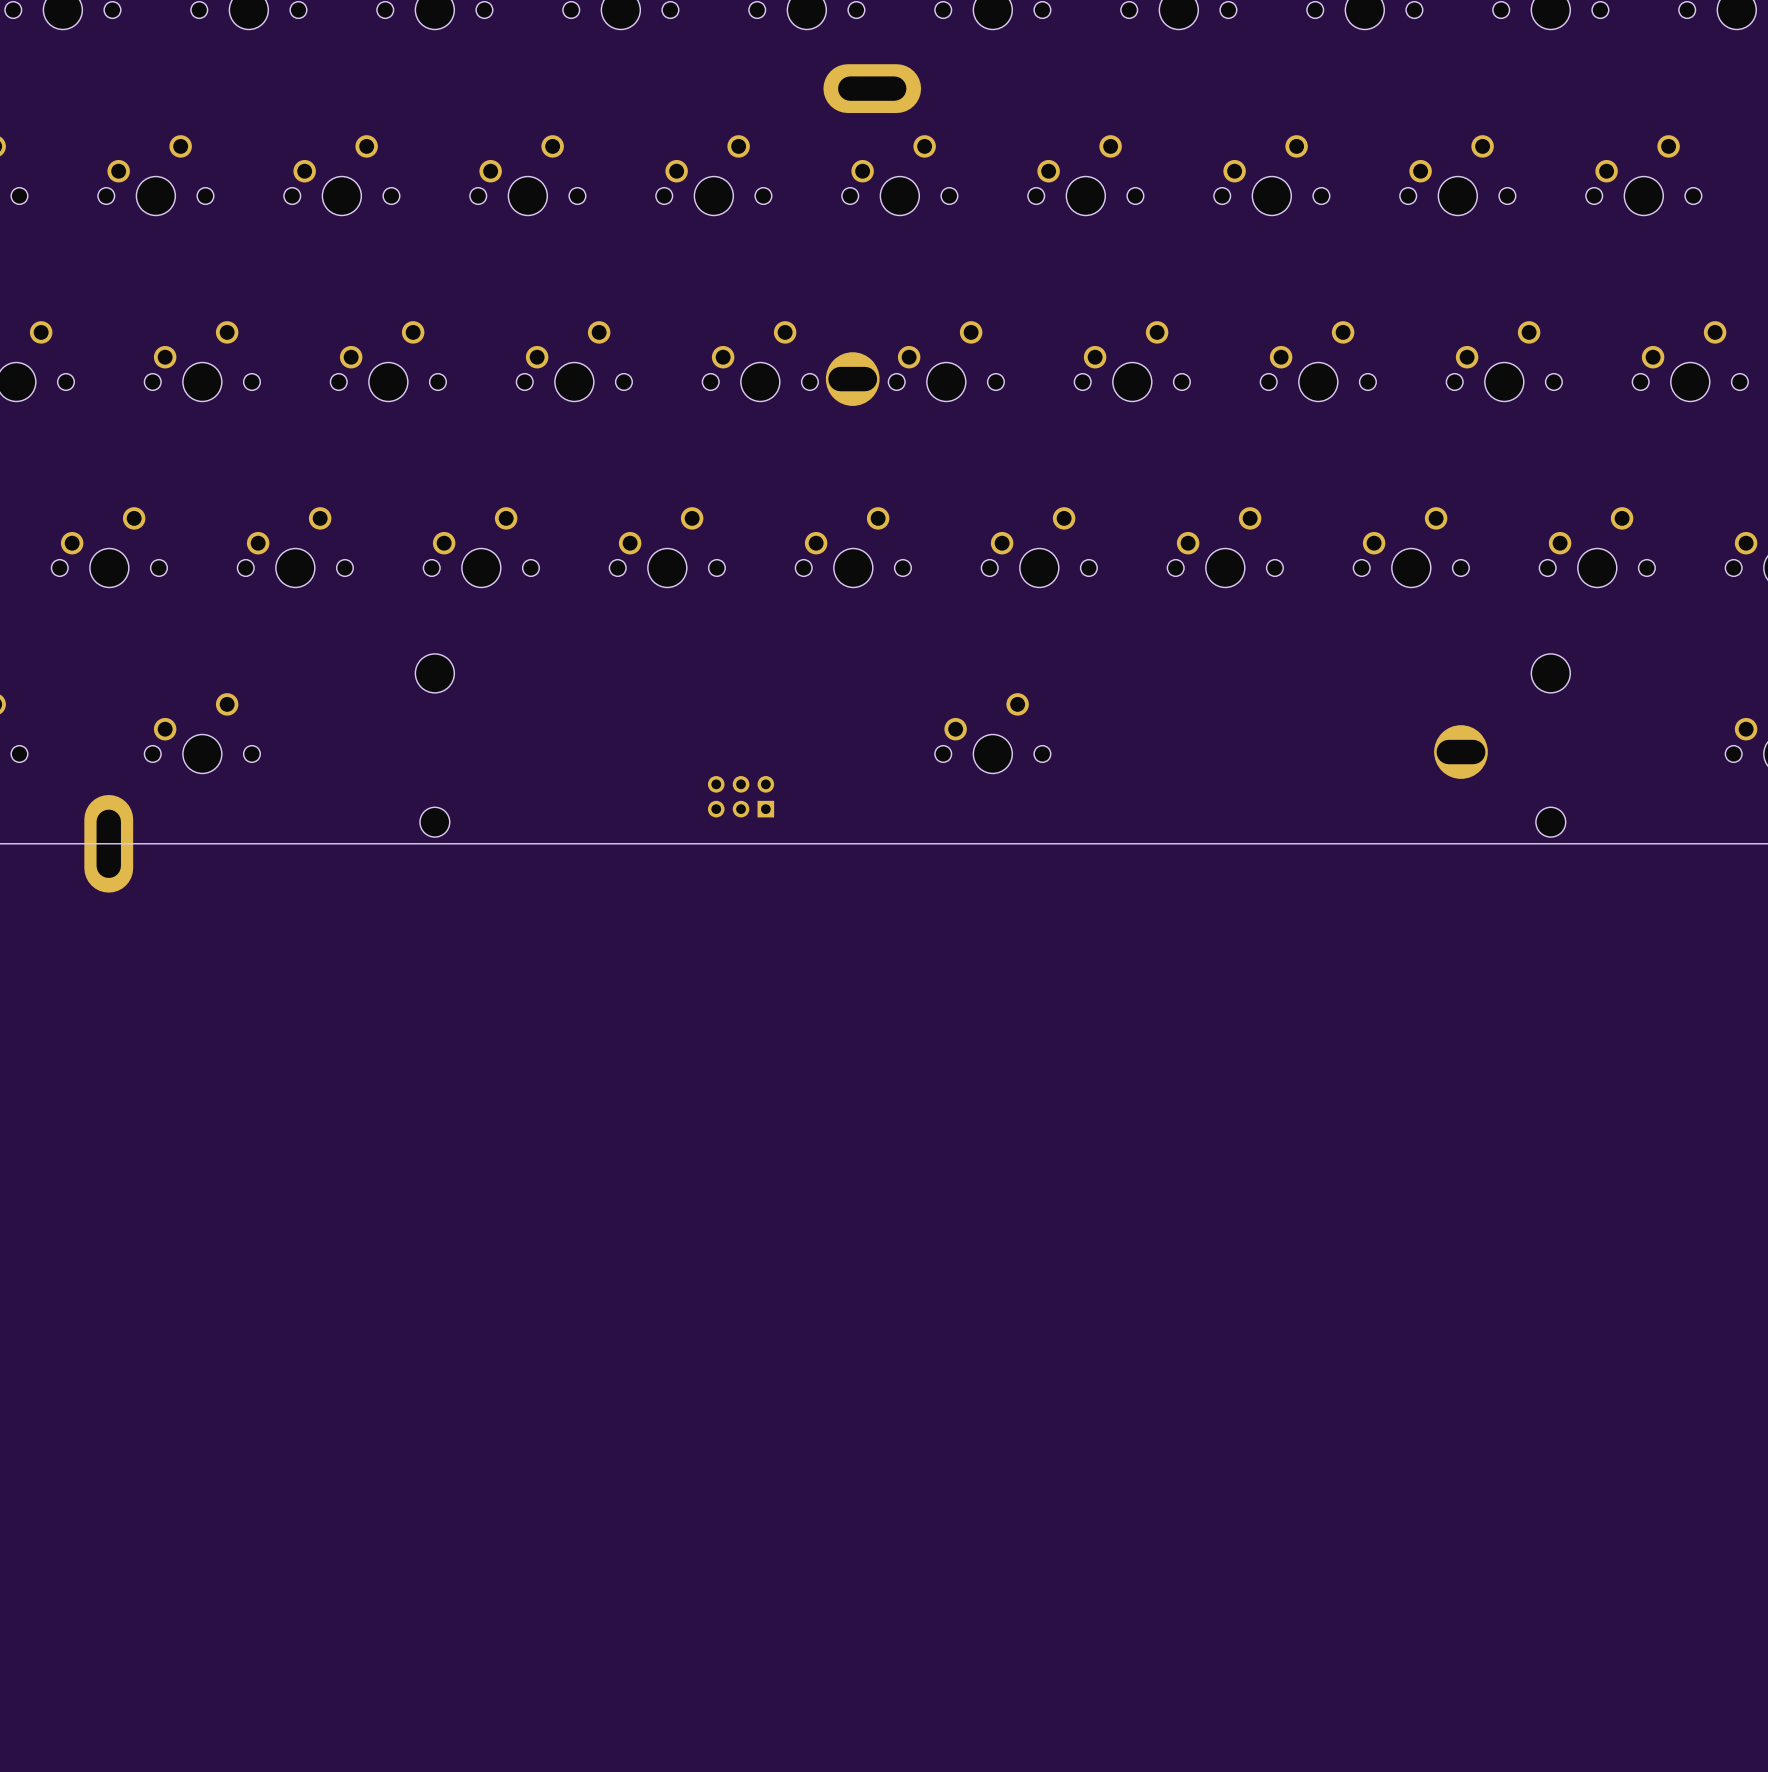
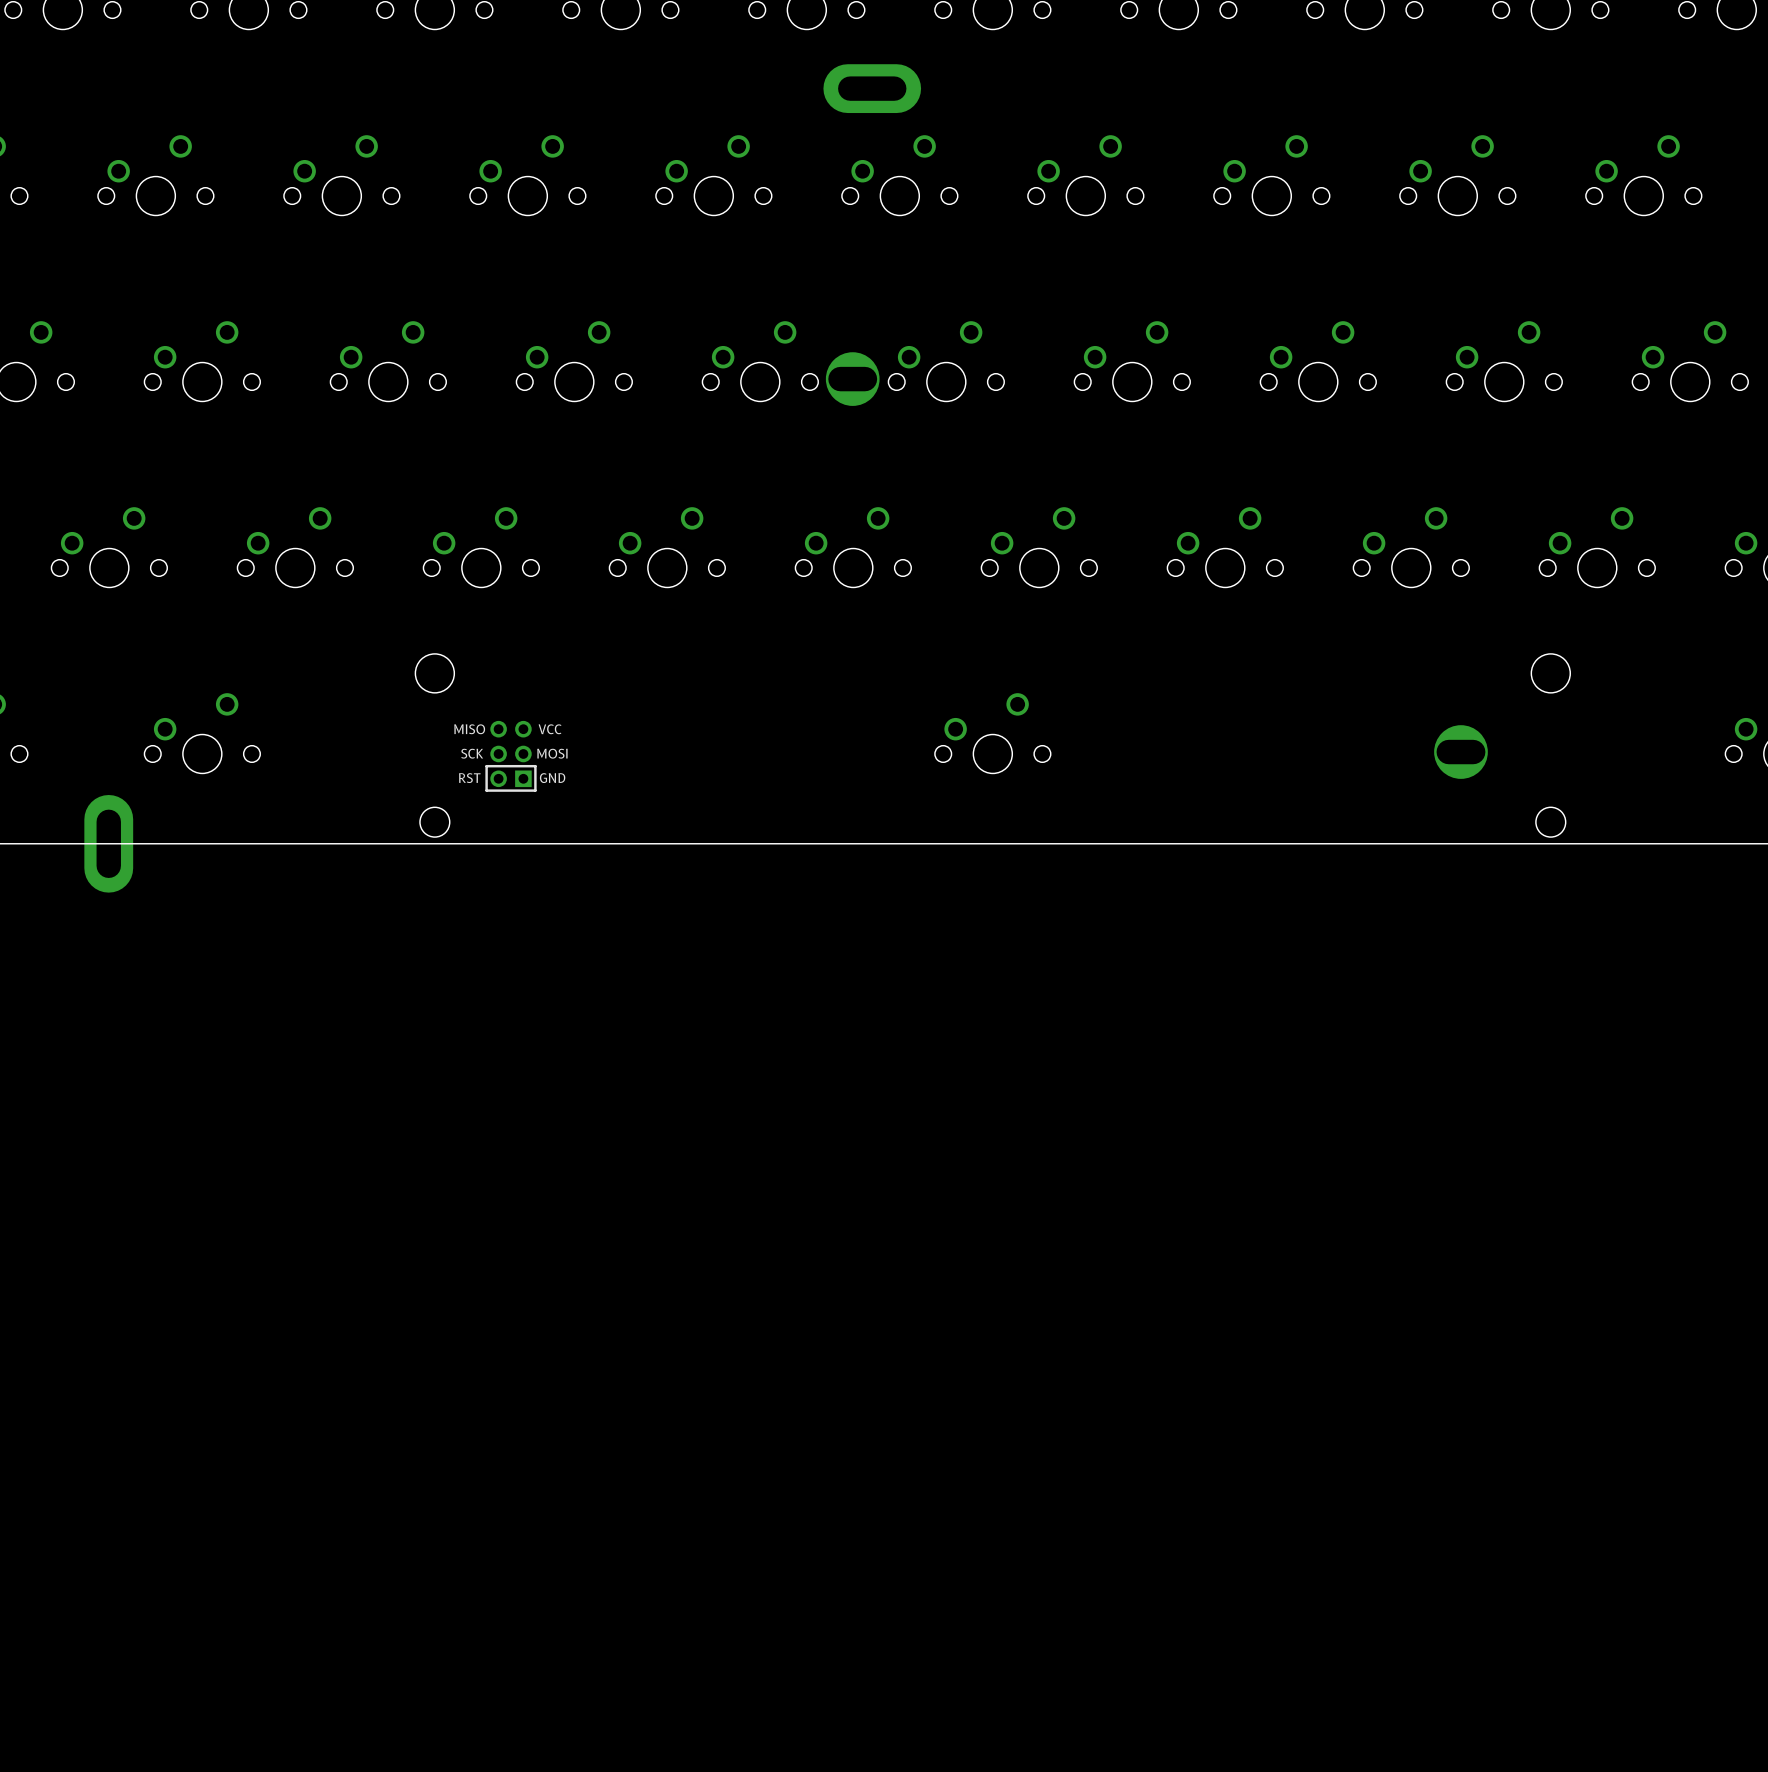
part side: bottom (741, 796) -> top (511, 756)

